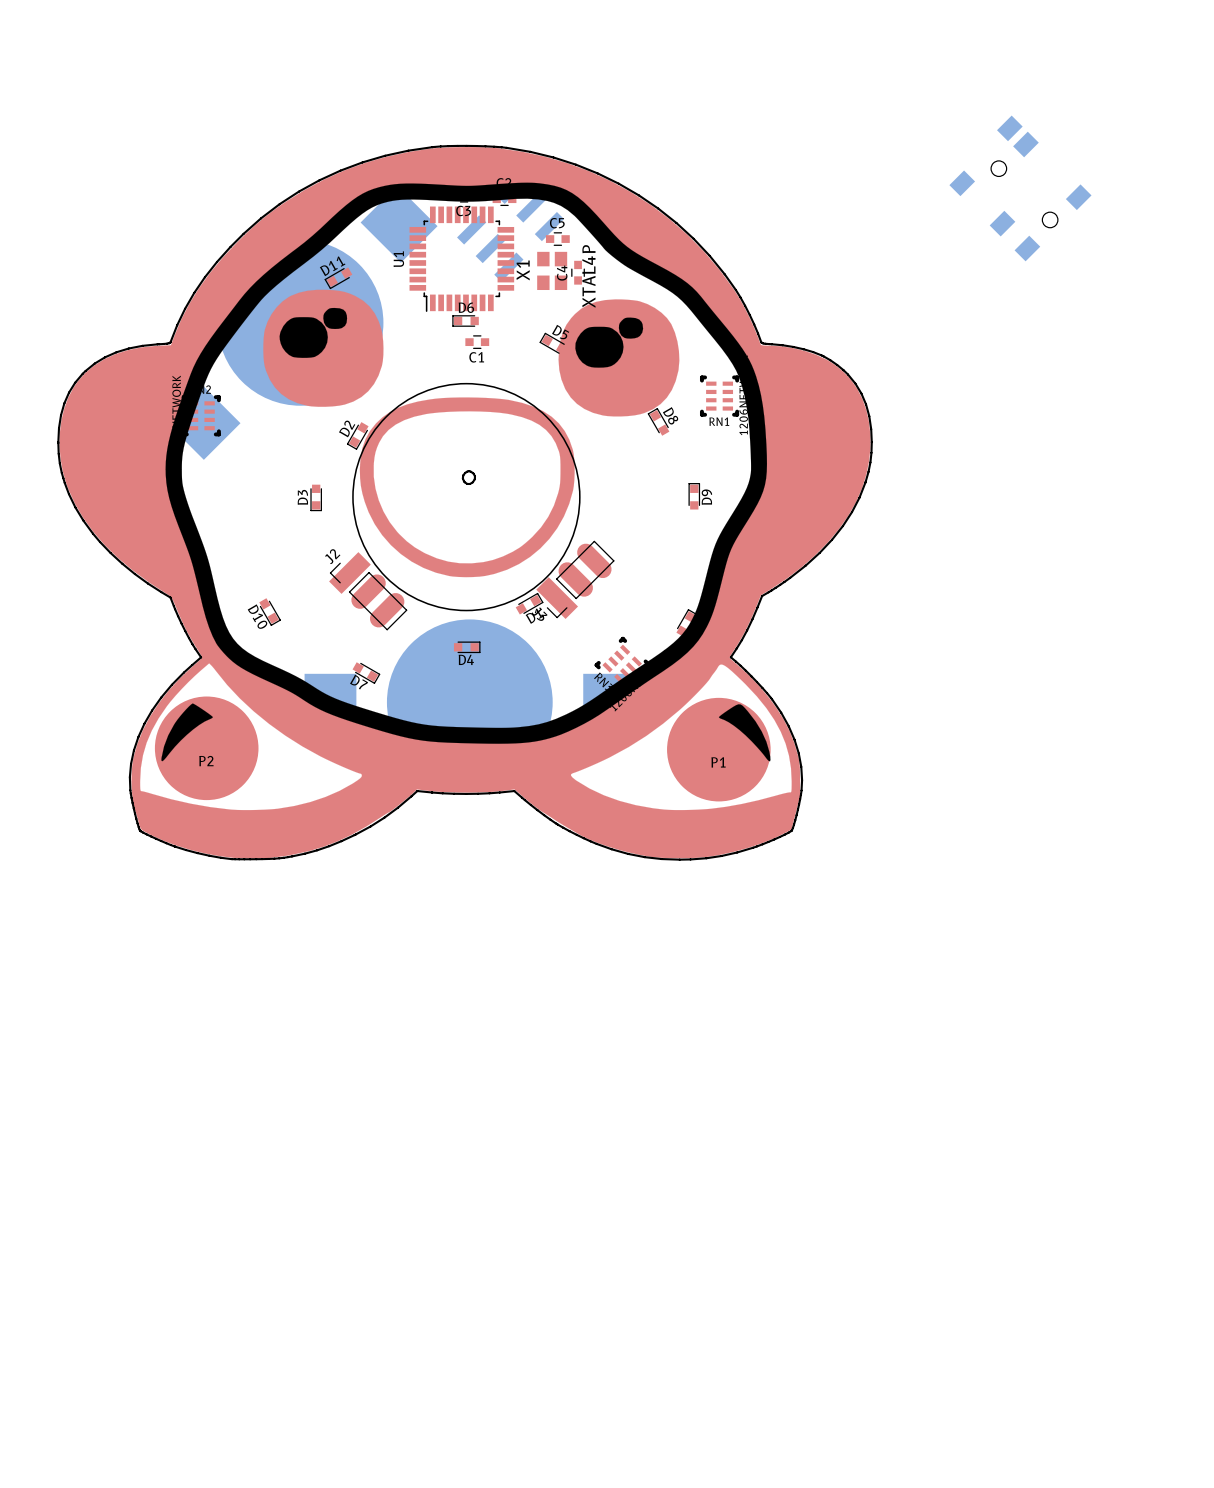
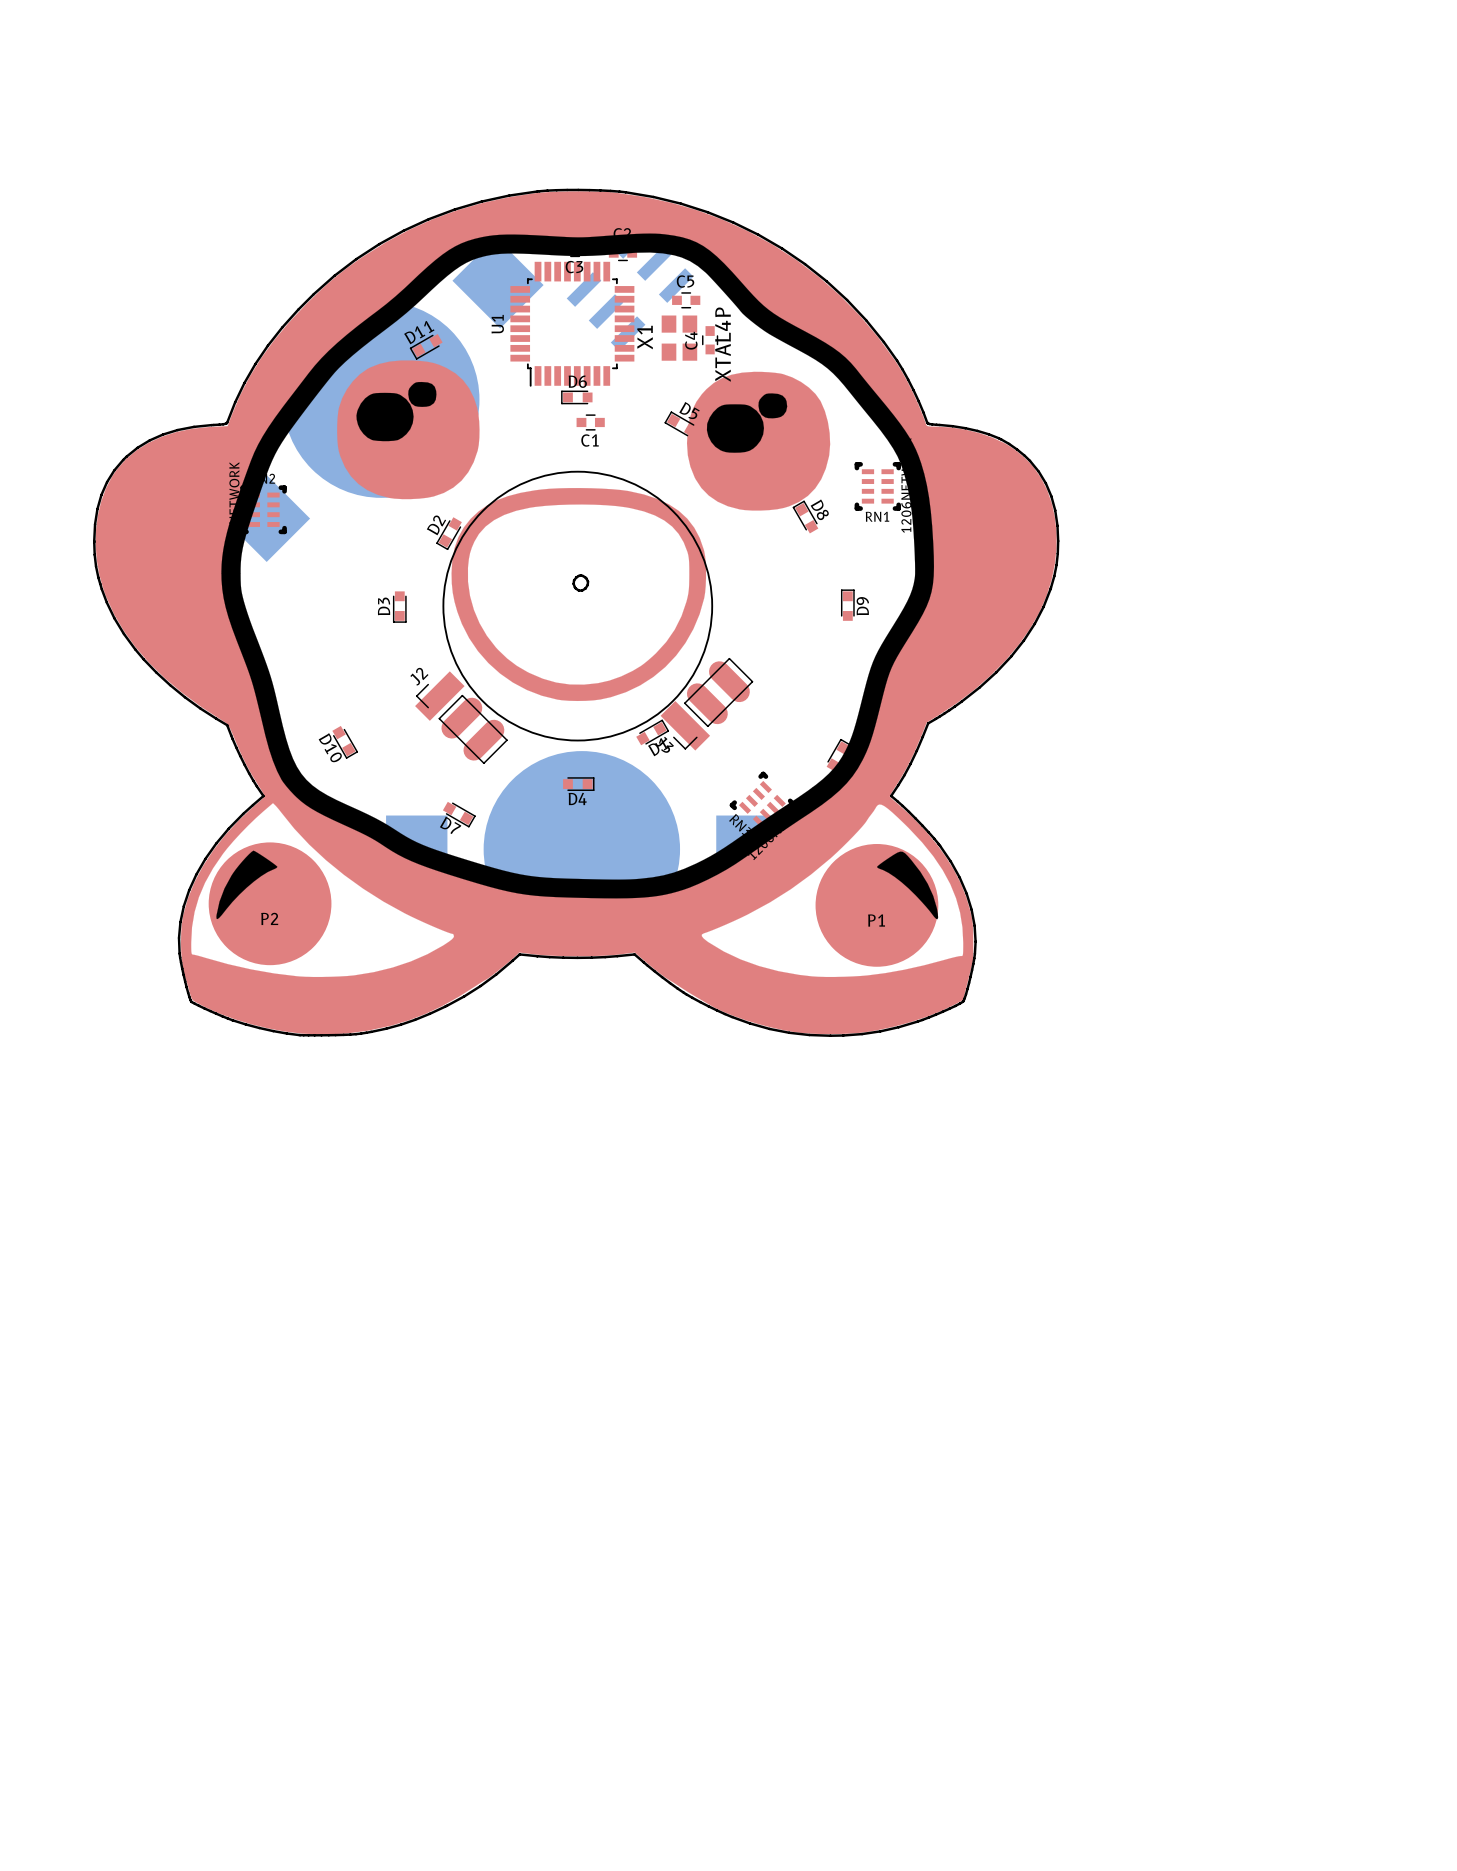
part: (1020, 188) -> none

